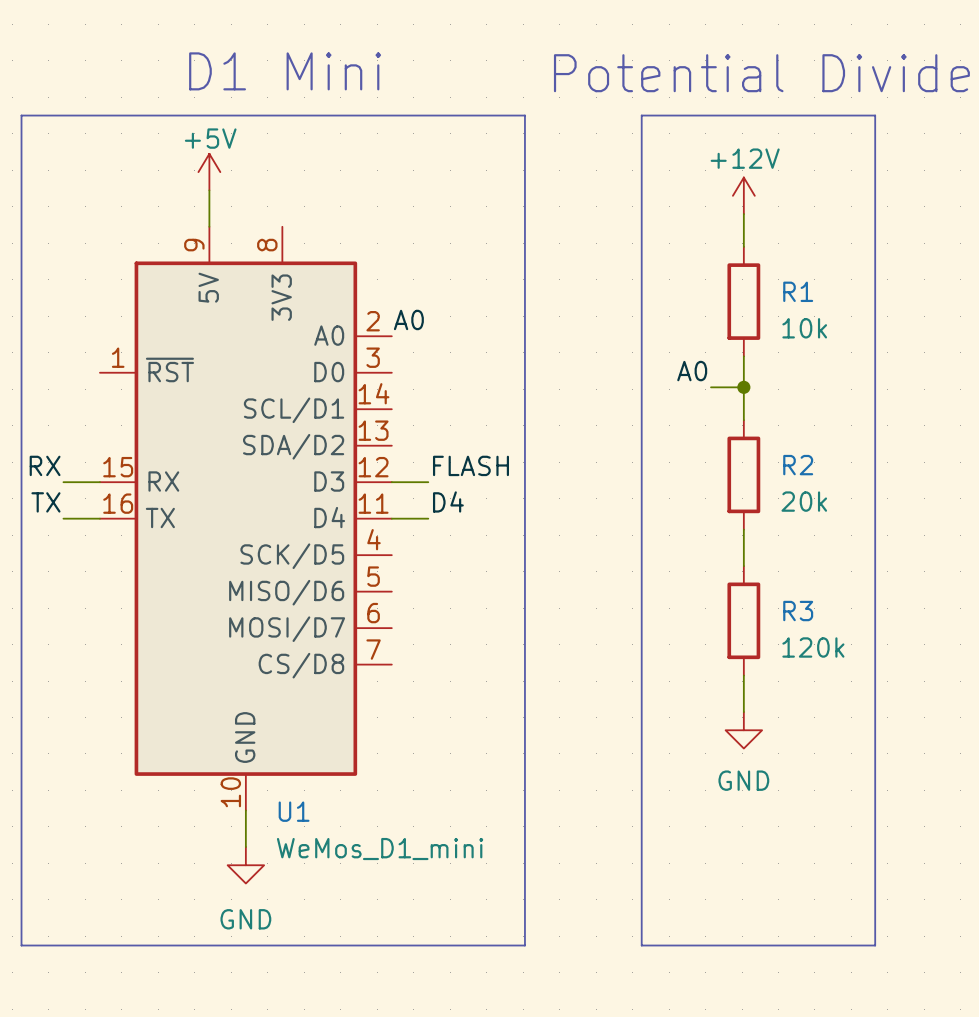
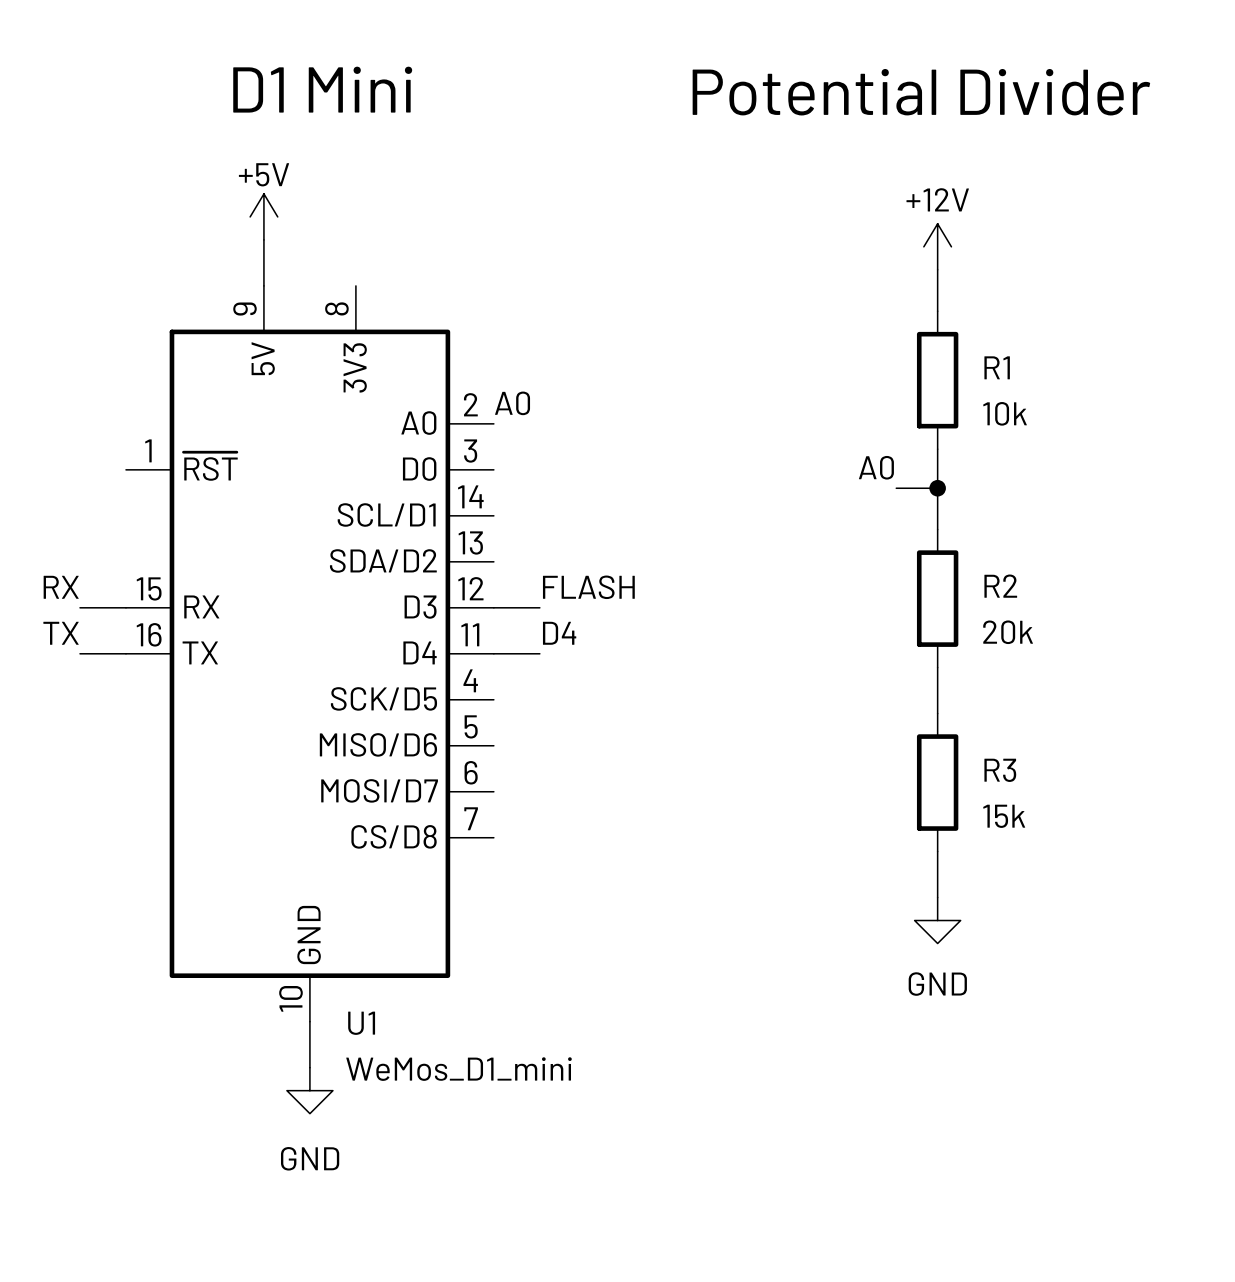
line: (21, 115) (524, 115) (524, 945) (21, 945) (21, 115) -> none
line: (641, 115) (875, 115) (875, 945) (641, 945) (641, 115) -> none
R3 value: 120k (813, 647) -> 15k (1004, 816)

